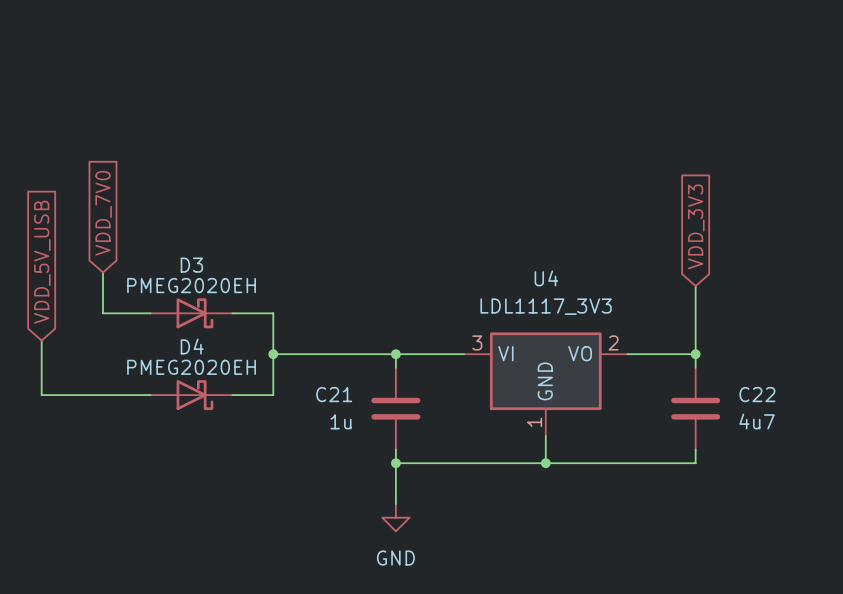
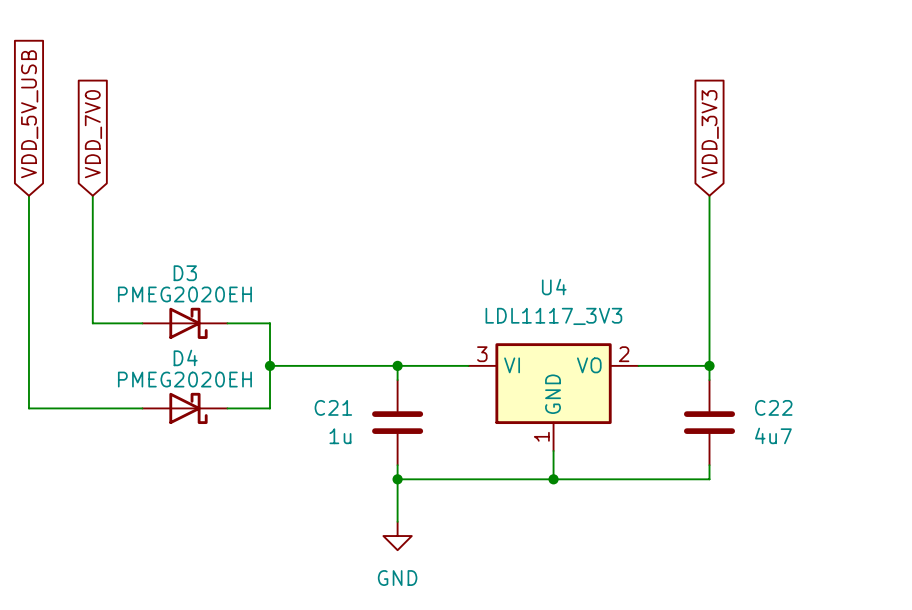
wire: none -> (28, 195) (28, 351)
wire: none -> (92, 195) (92, 280)
wire: none -> (709, 195) (709, 295)
global label position: VDD_7V0 (103, 213) -> VDD_7V0 (93, 134)
global label position: VDD_3V3 (696, 226) -> VDD_3V3 (710, 134)
global label position: VDD_5V_USB (42, 262) -> VDD_5V_USB (29, 114)

